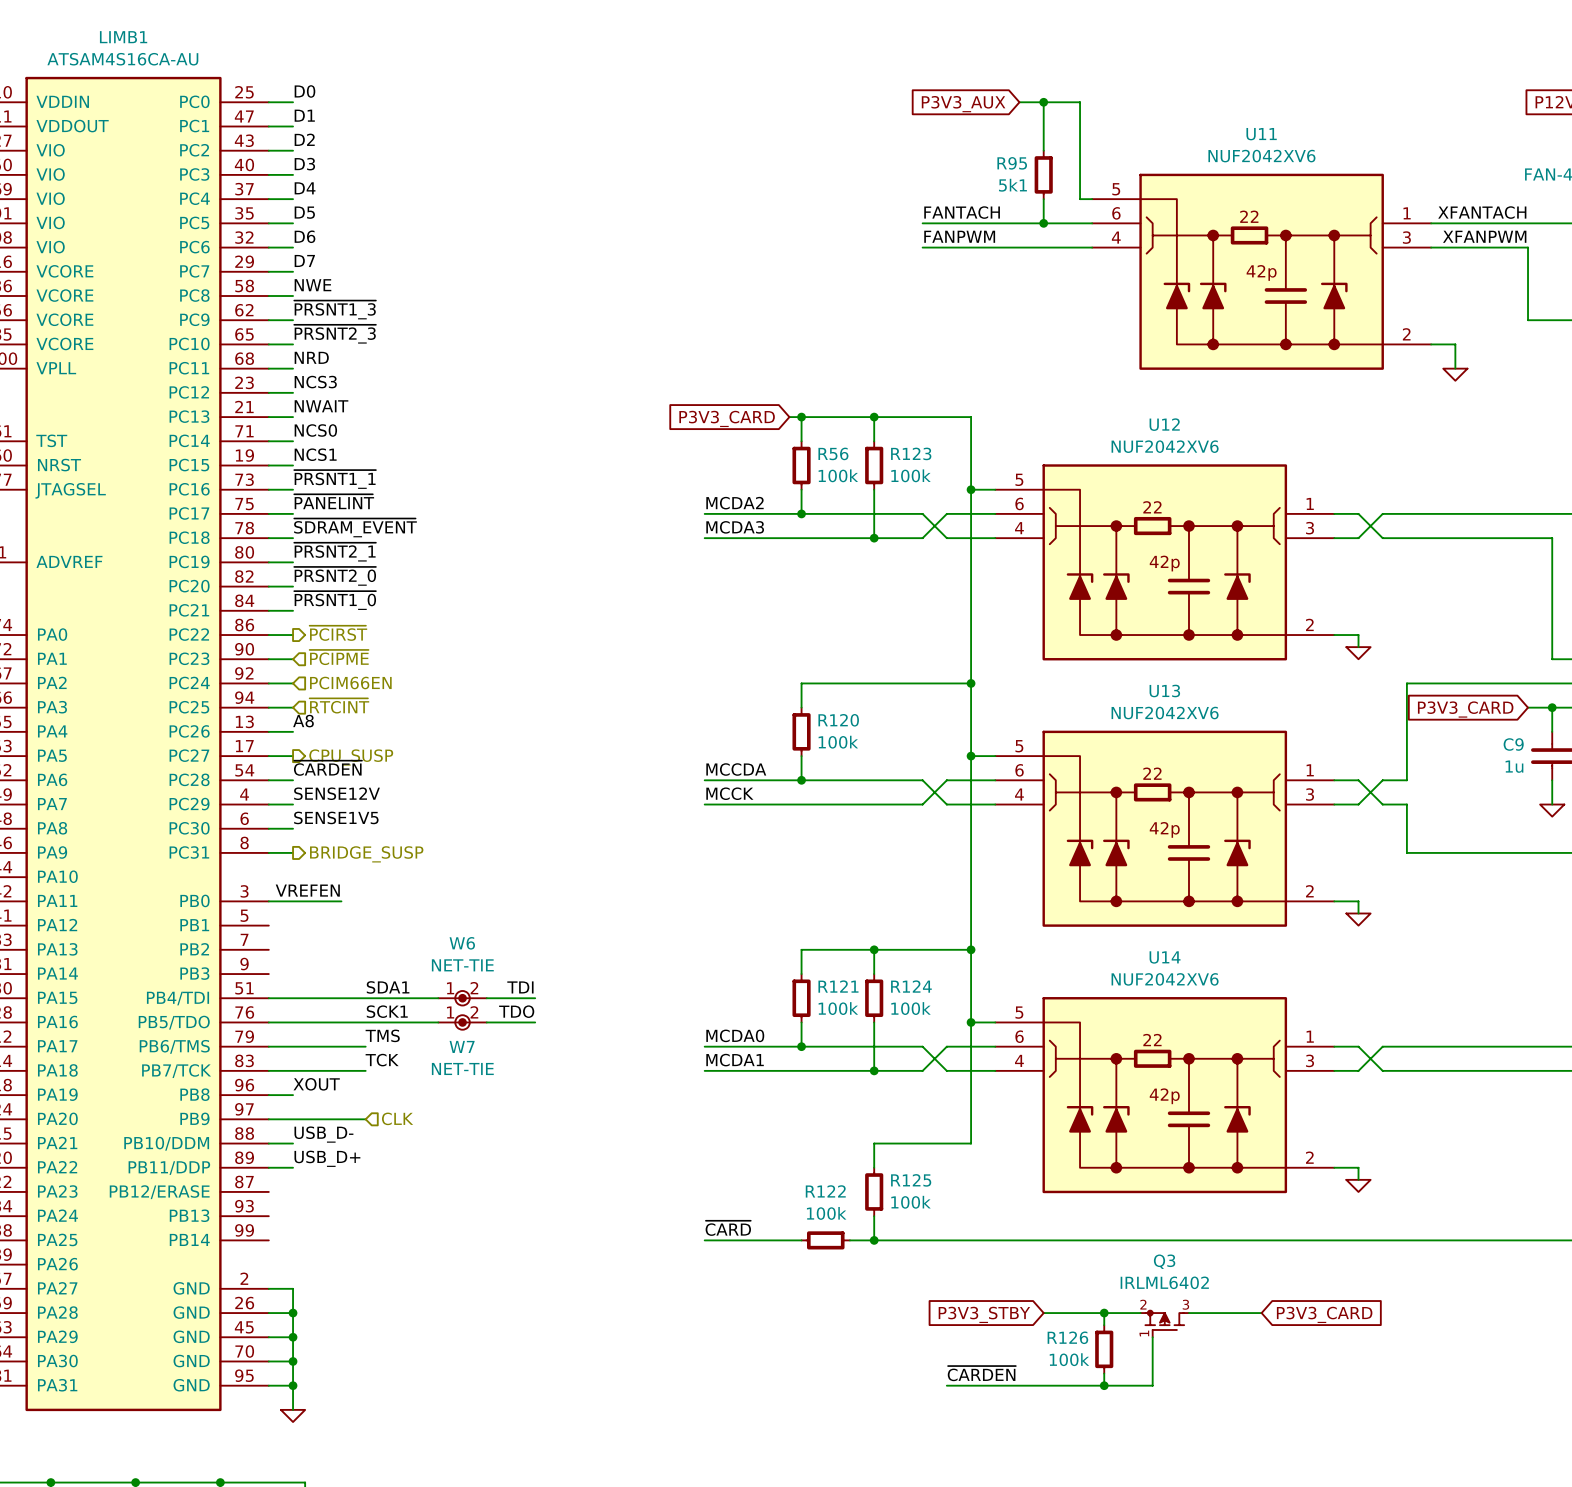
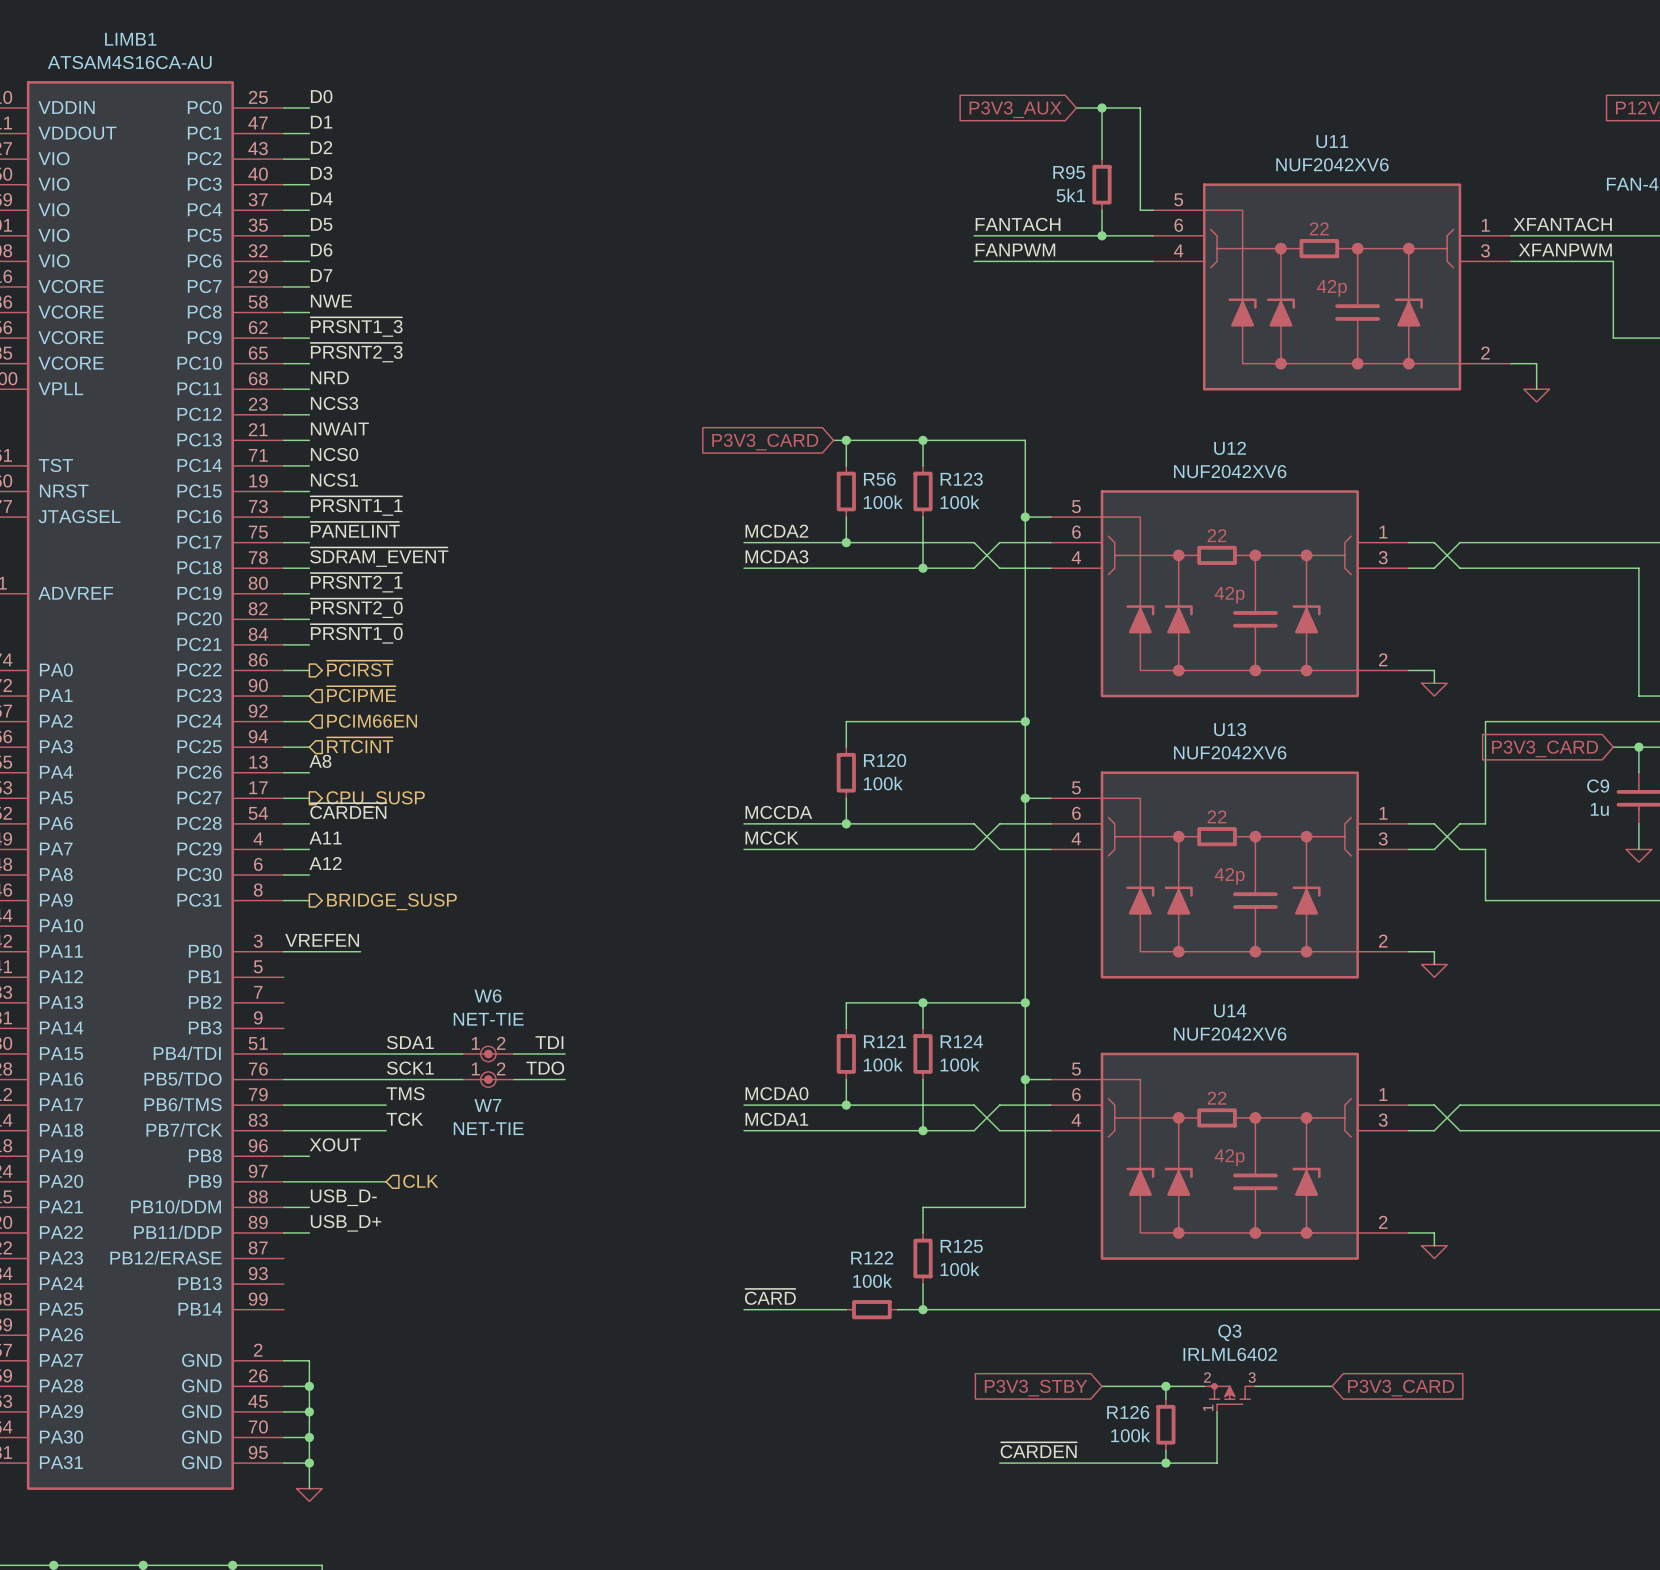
label: SENSE12V (337, 793) -> A11 (325, 838)
label: SENSE1V5 (336, 817) -> A12 (325, 863)

